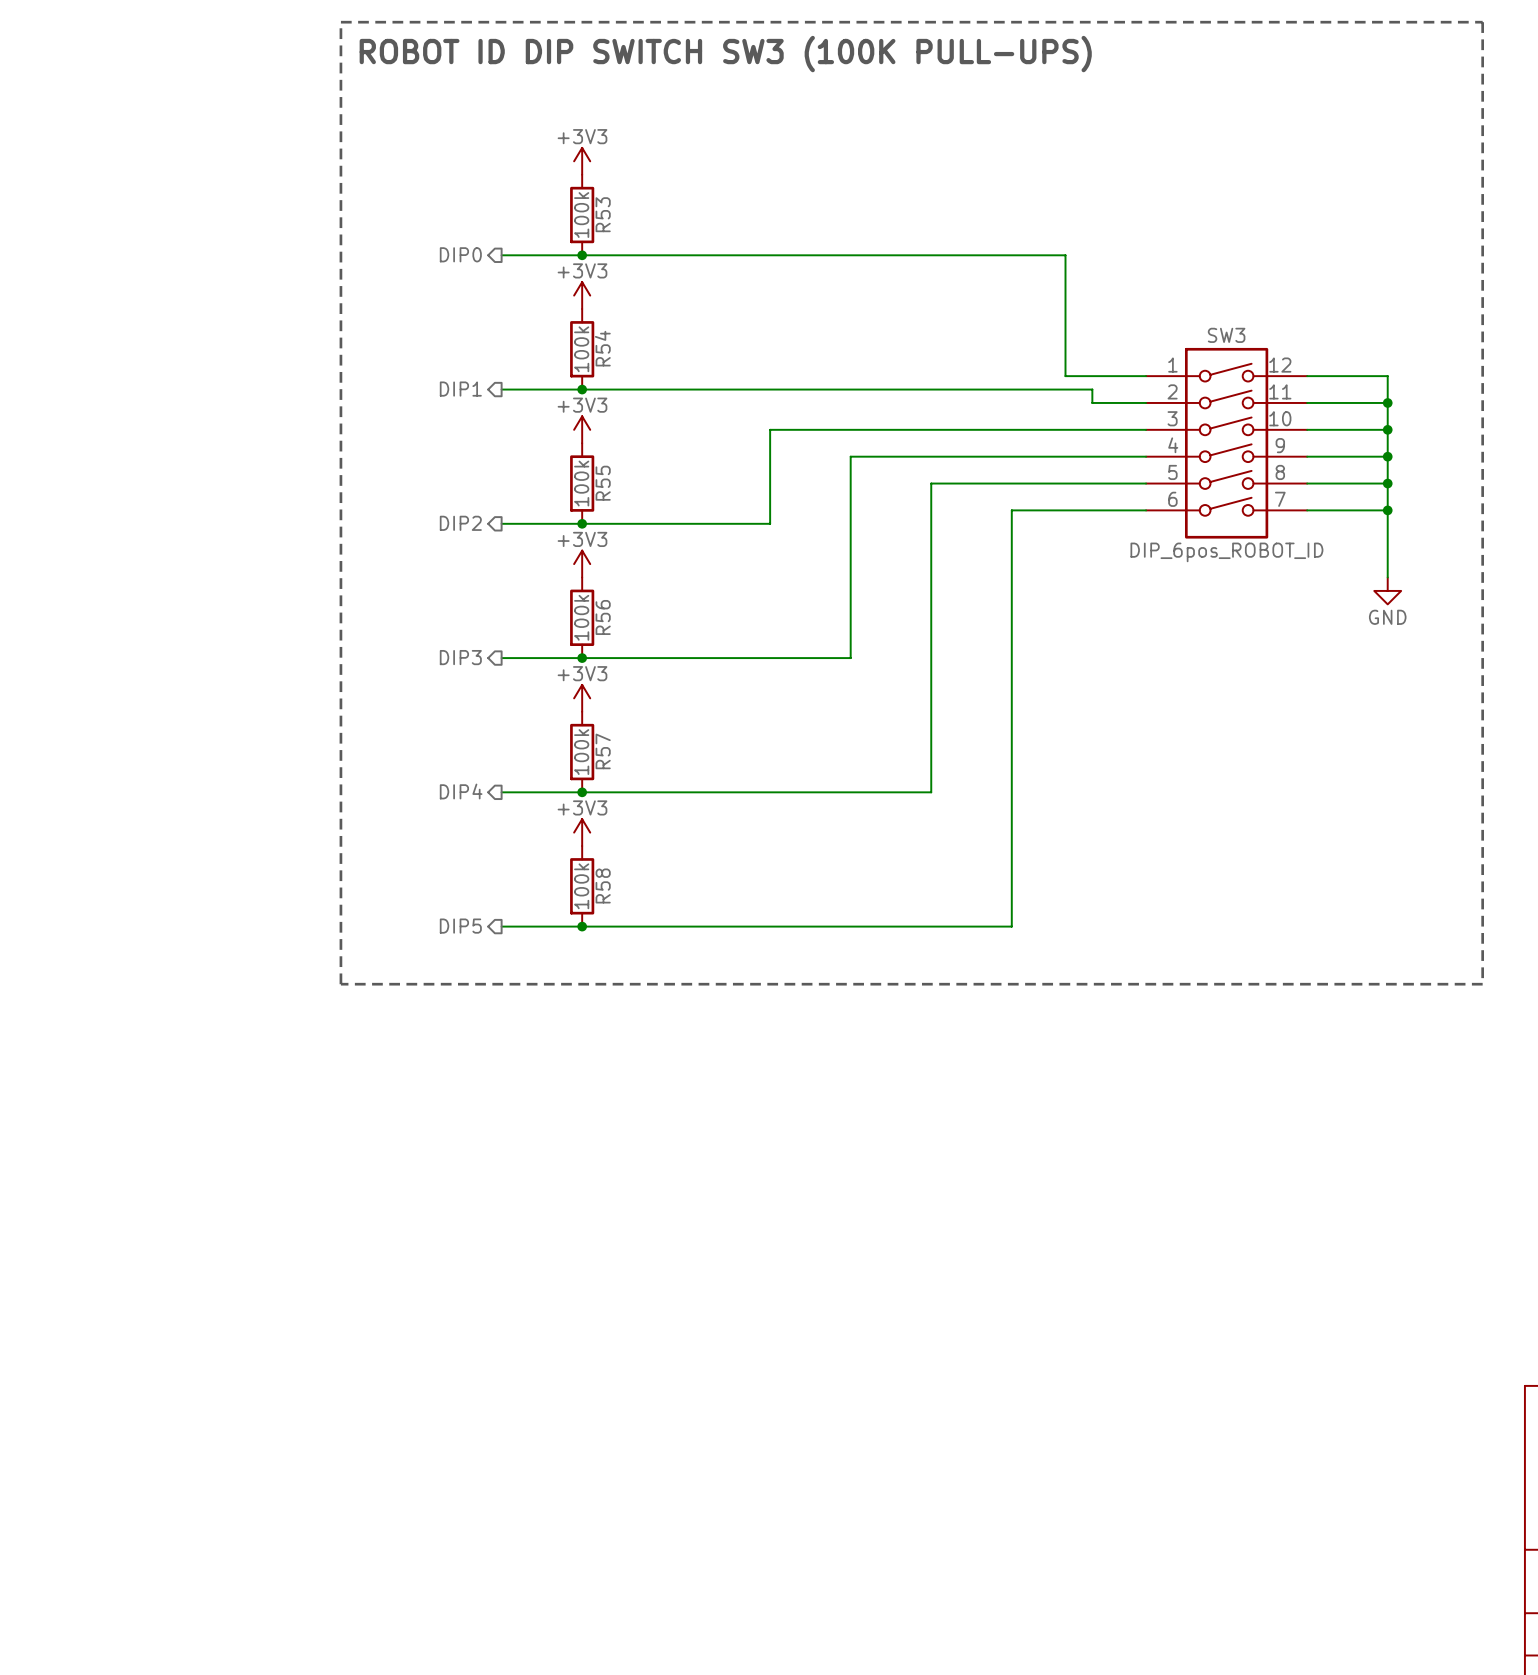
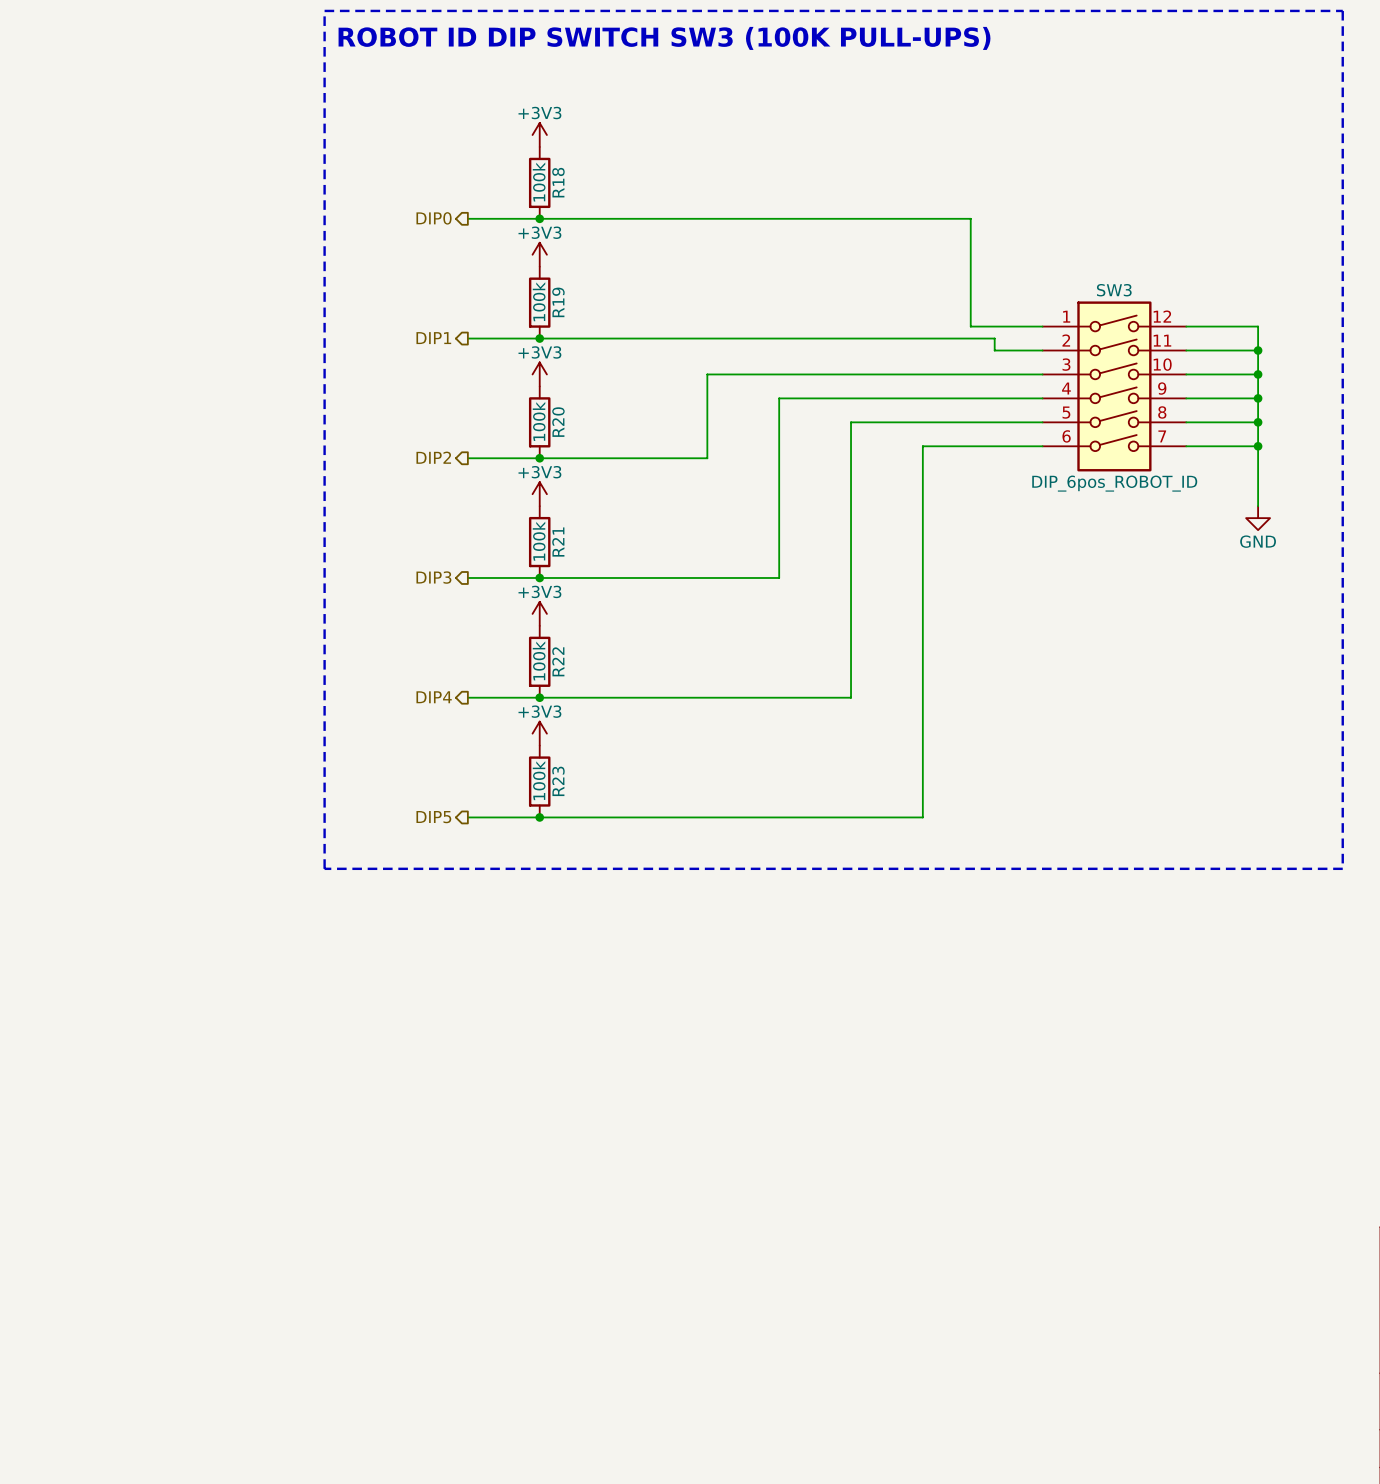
R53 name: R53 (603, 214) -> R18 (558, 182)
R54 name: R54 (602, 348) -> R19 (558, 302)
R55 name: R55 (603, 483) -> R20 (558, 422)
R56 name: R56 (603, 617) -> R21 (558, 542)
R57 name: R57 (603, 751) -> R22 (558, 661)
R58 name: R58 (603, 885) -> R23 (558, 781)

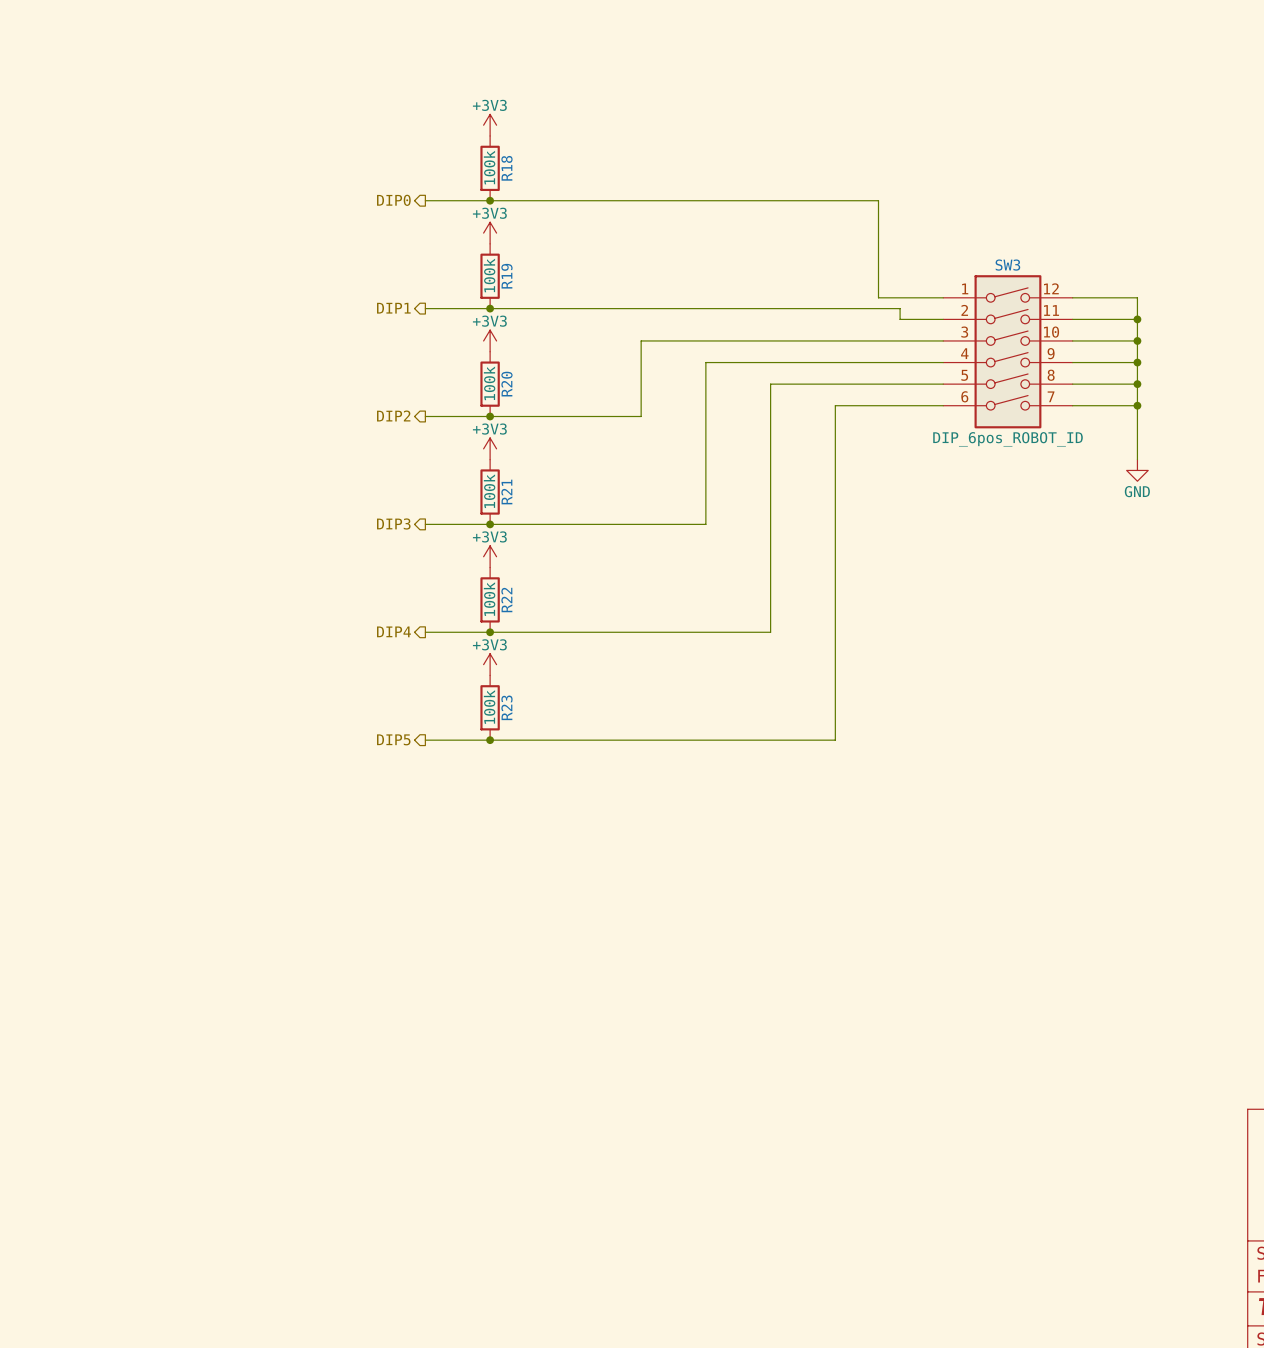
line: (324, 10) (1342, 10) (1342, 868) (324, 868) (324, 10) -> none
text: ROBOT ID DIP SWITCH SW3 (100K PULL-UPS) (664, 38) -> none

